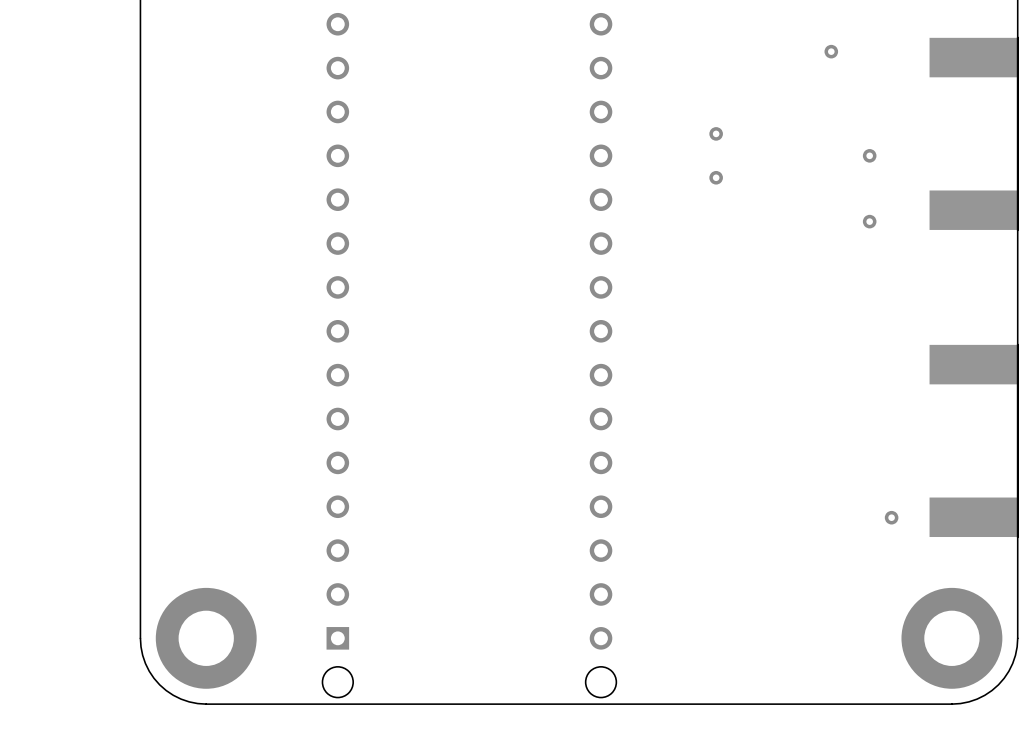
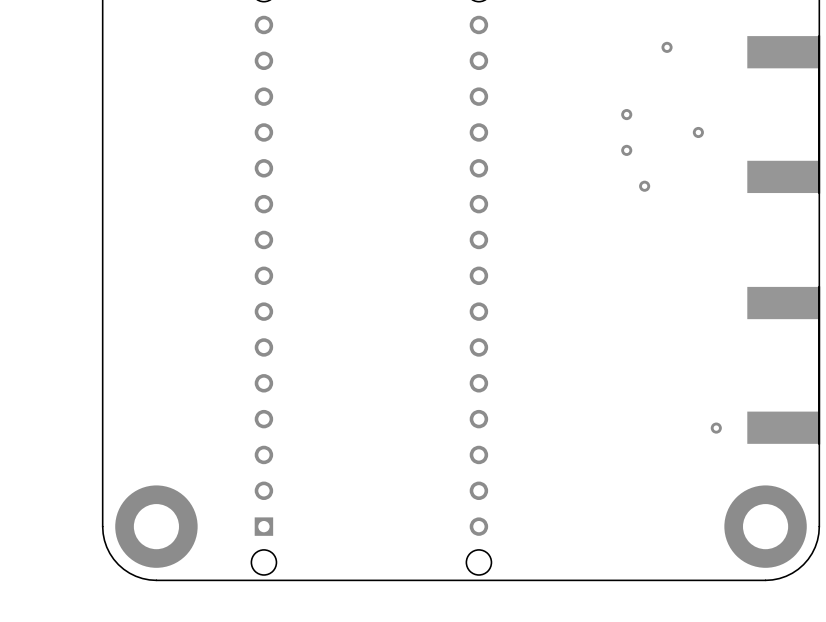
via: (716, 133) -> none
via: none -> (626, 114)
via: (716, 177) -> none
via: none -> (626, 150)
via: none -> (644, 186)
via: (869, 221) -> none

